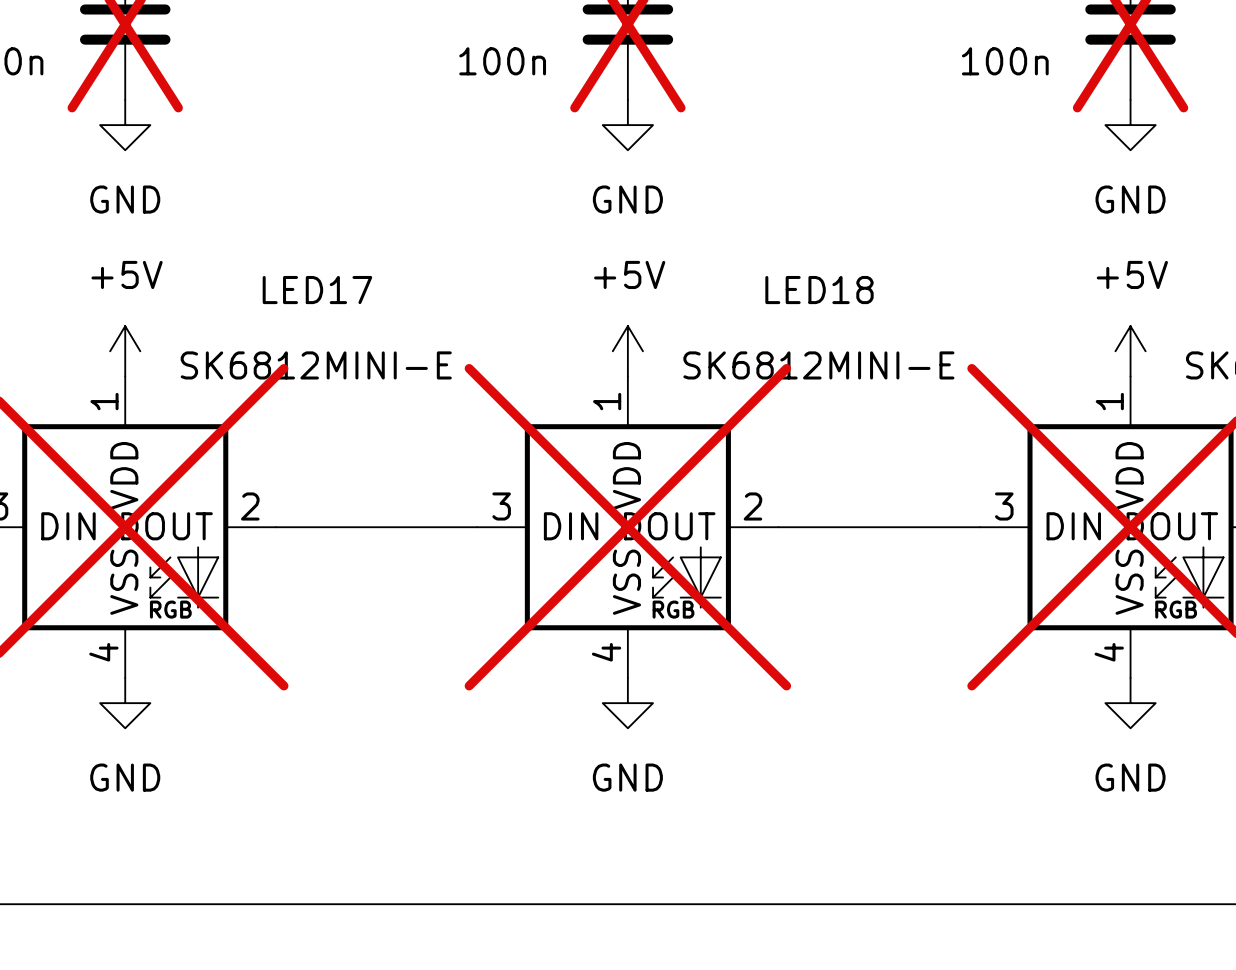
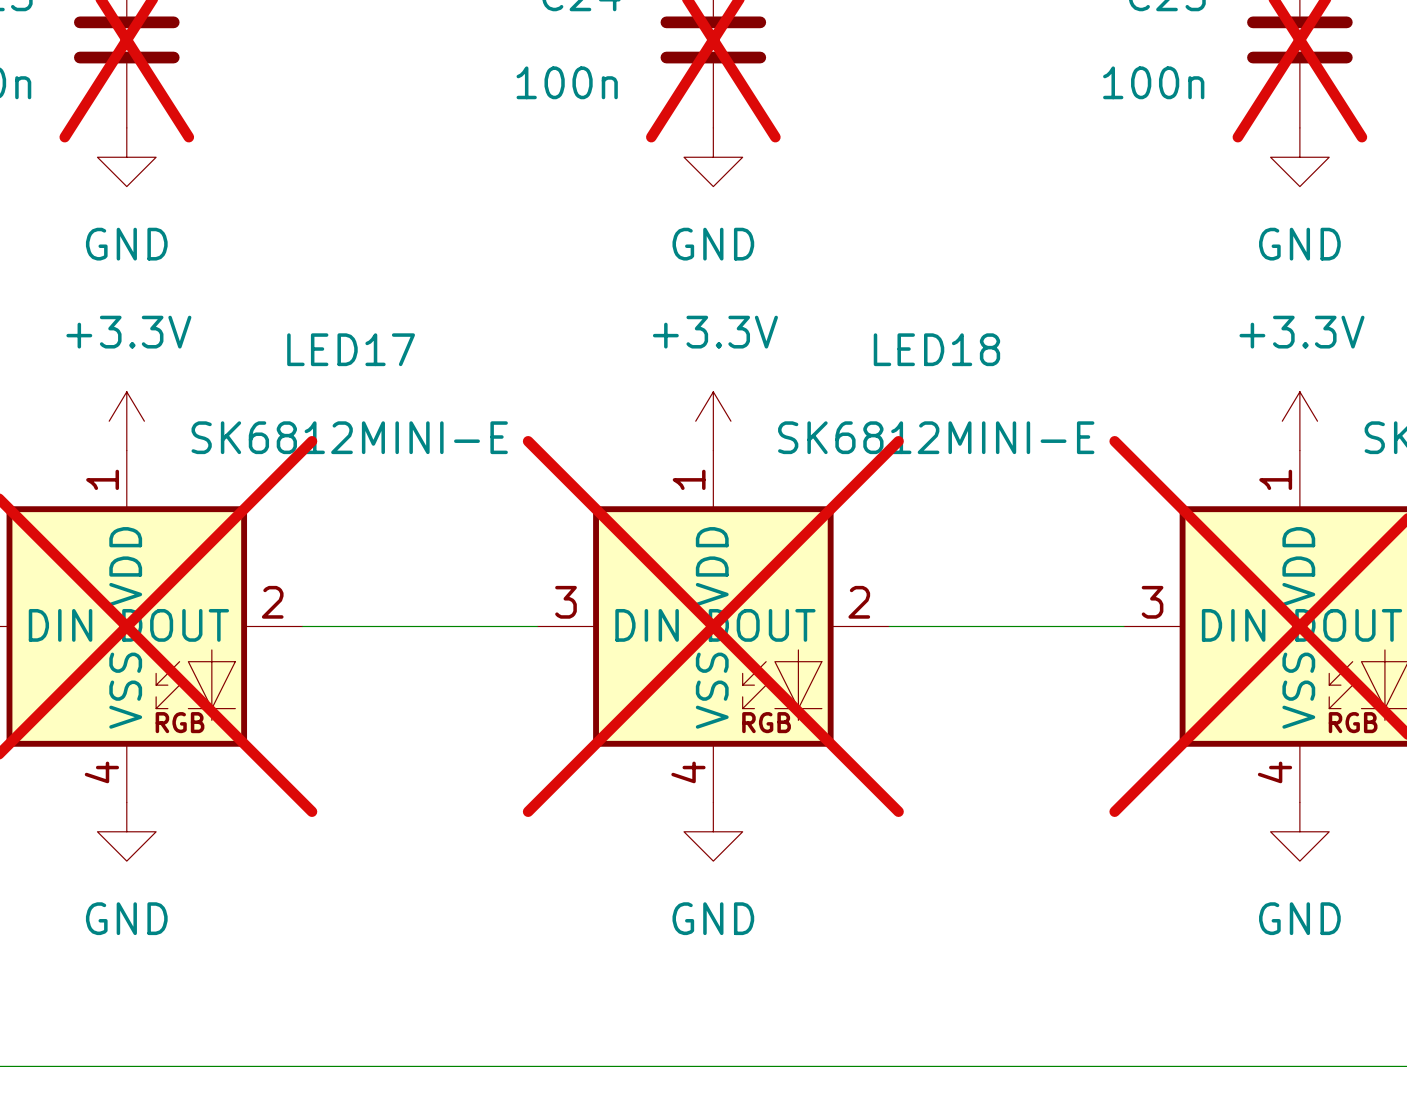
power symbol: +5V (125, 351) -> +3.3V (126, 421)
power symbol: +5V (627, 351) -> +3.3V (713, 421)
power symbol: +5V (1130, 351) -> +3.3V (1299, 421)

